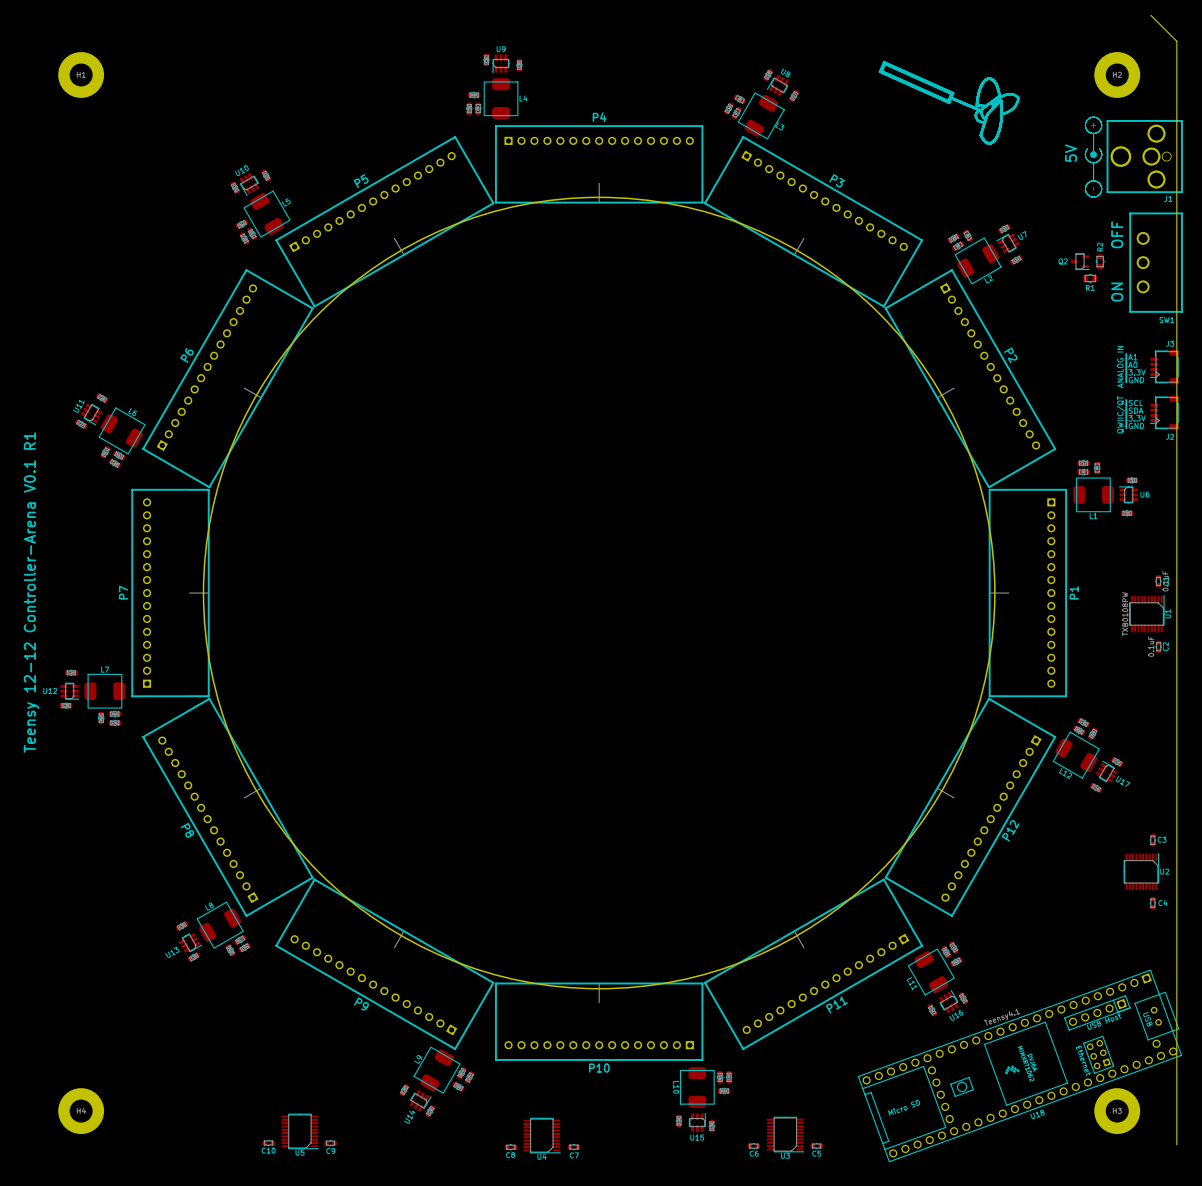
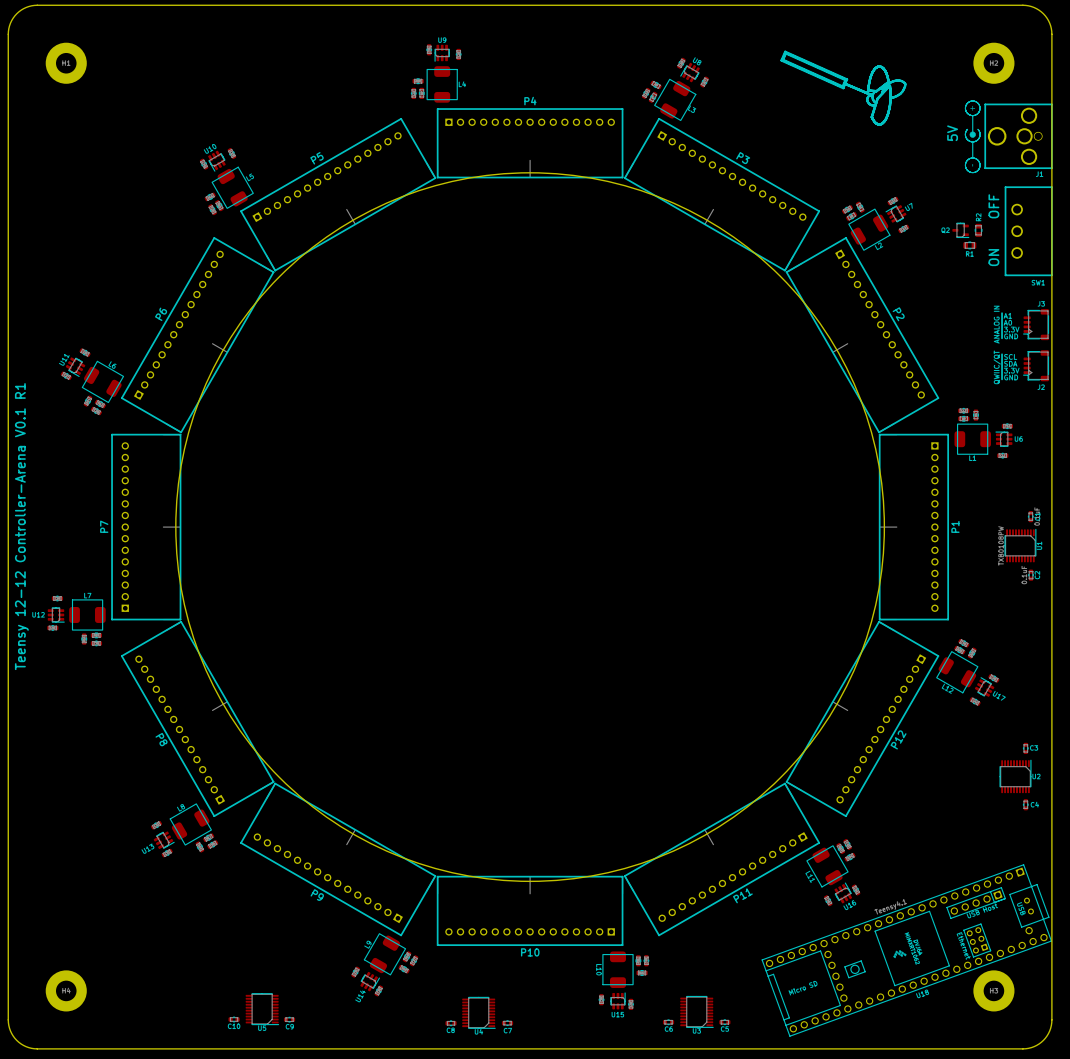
board edge: none -> (37, 5) (1022, 5) (1034, 7) (1043, 13) (1049, 23) (1051, 34) (1051, 1019) (1049, 1031) (1043, 1040) (1034, 1046) (1022, 1048) (37, 1048) (26, 1046) (16, 1040) (10, 1031) (8, 1019) (8, 34) (10, 23) (16, 13) (26, 7) (37, 5)
board edge: (1150, 15) (1176, 41) (1176, 1144) -> none

